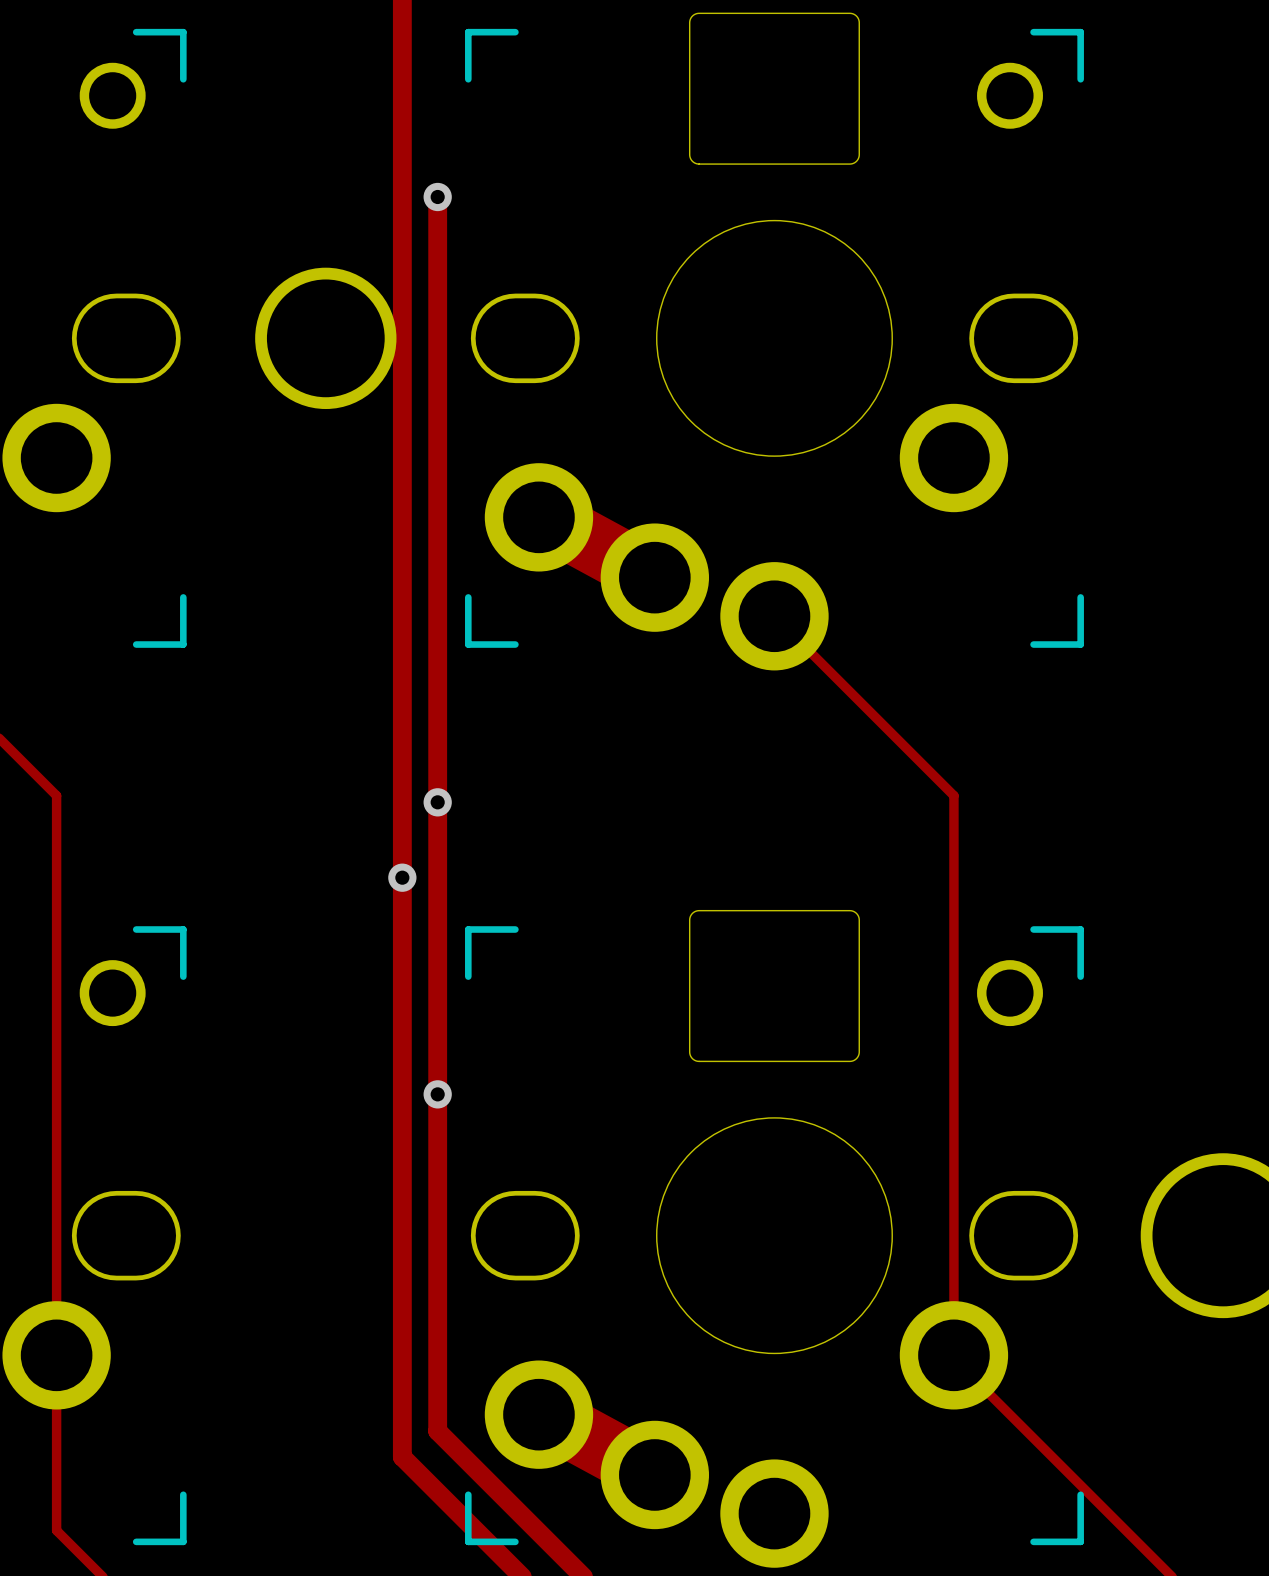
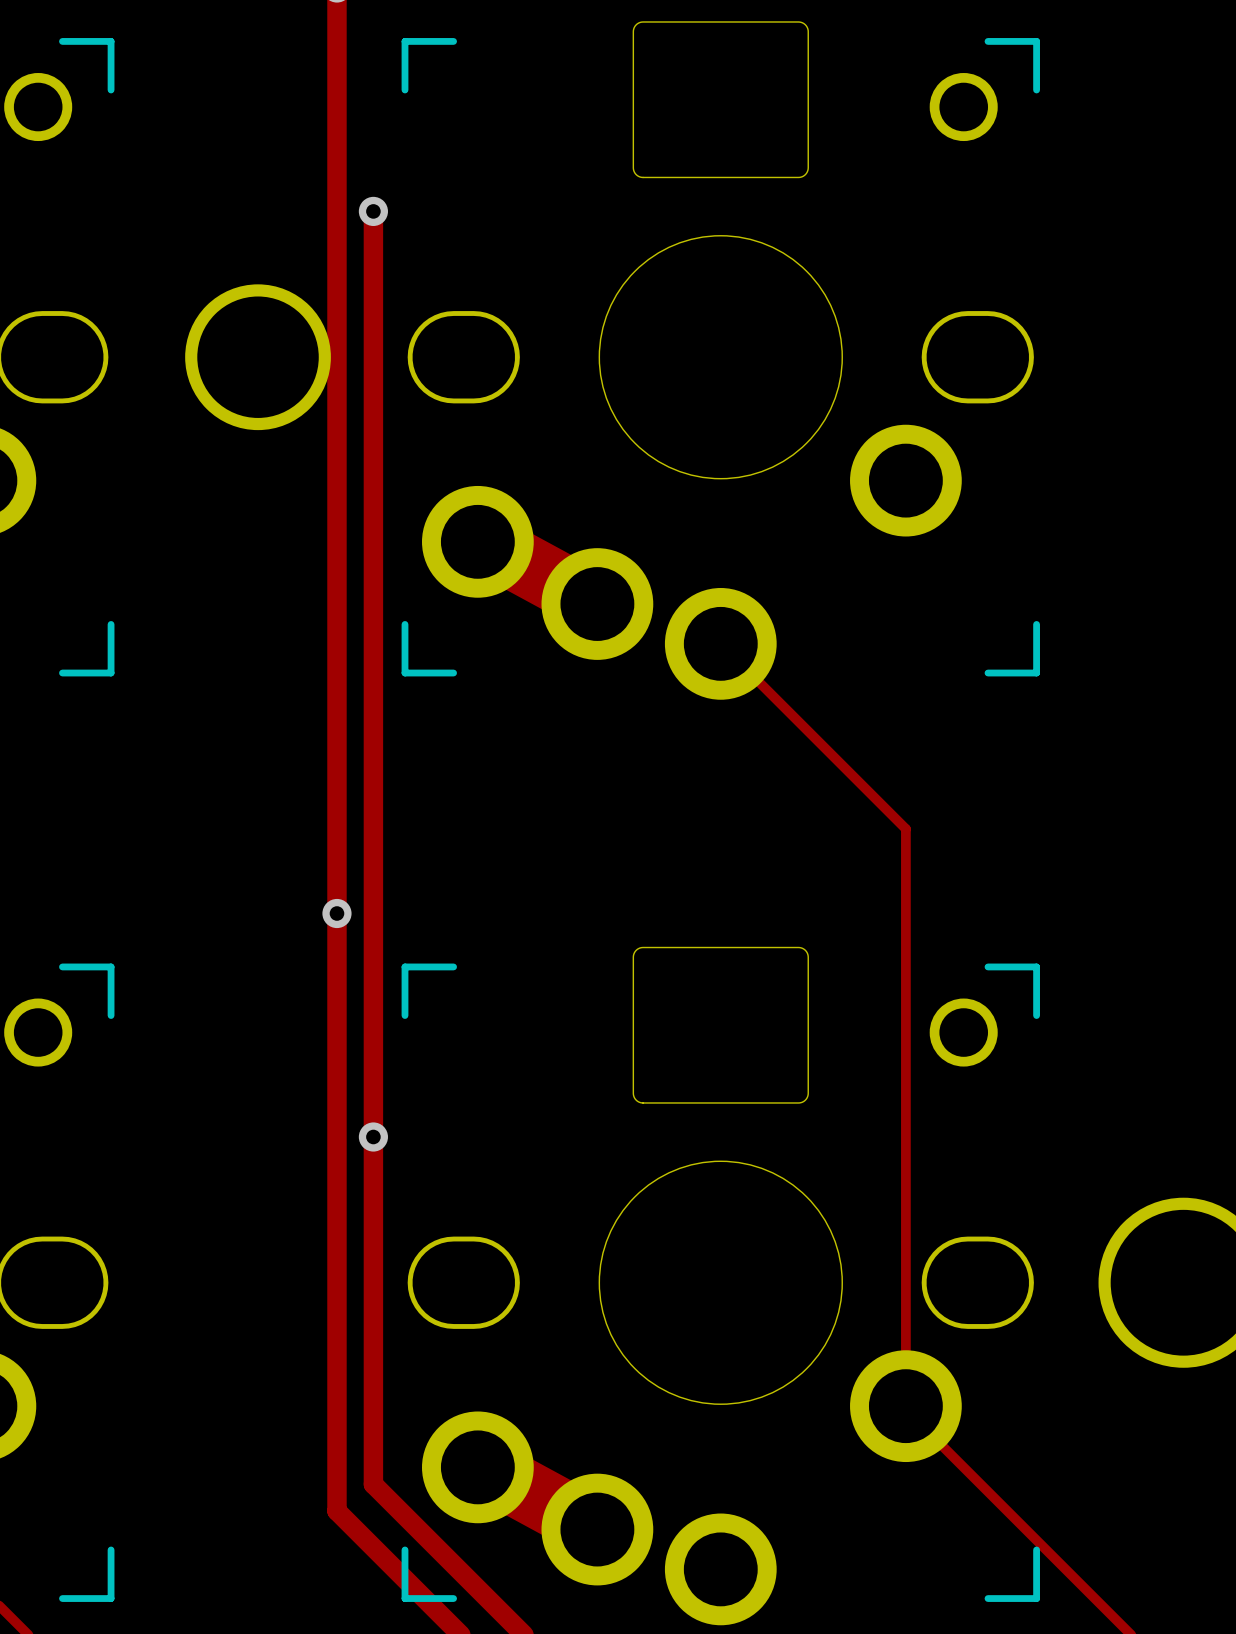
via: (437, 802) -> none

